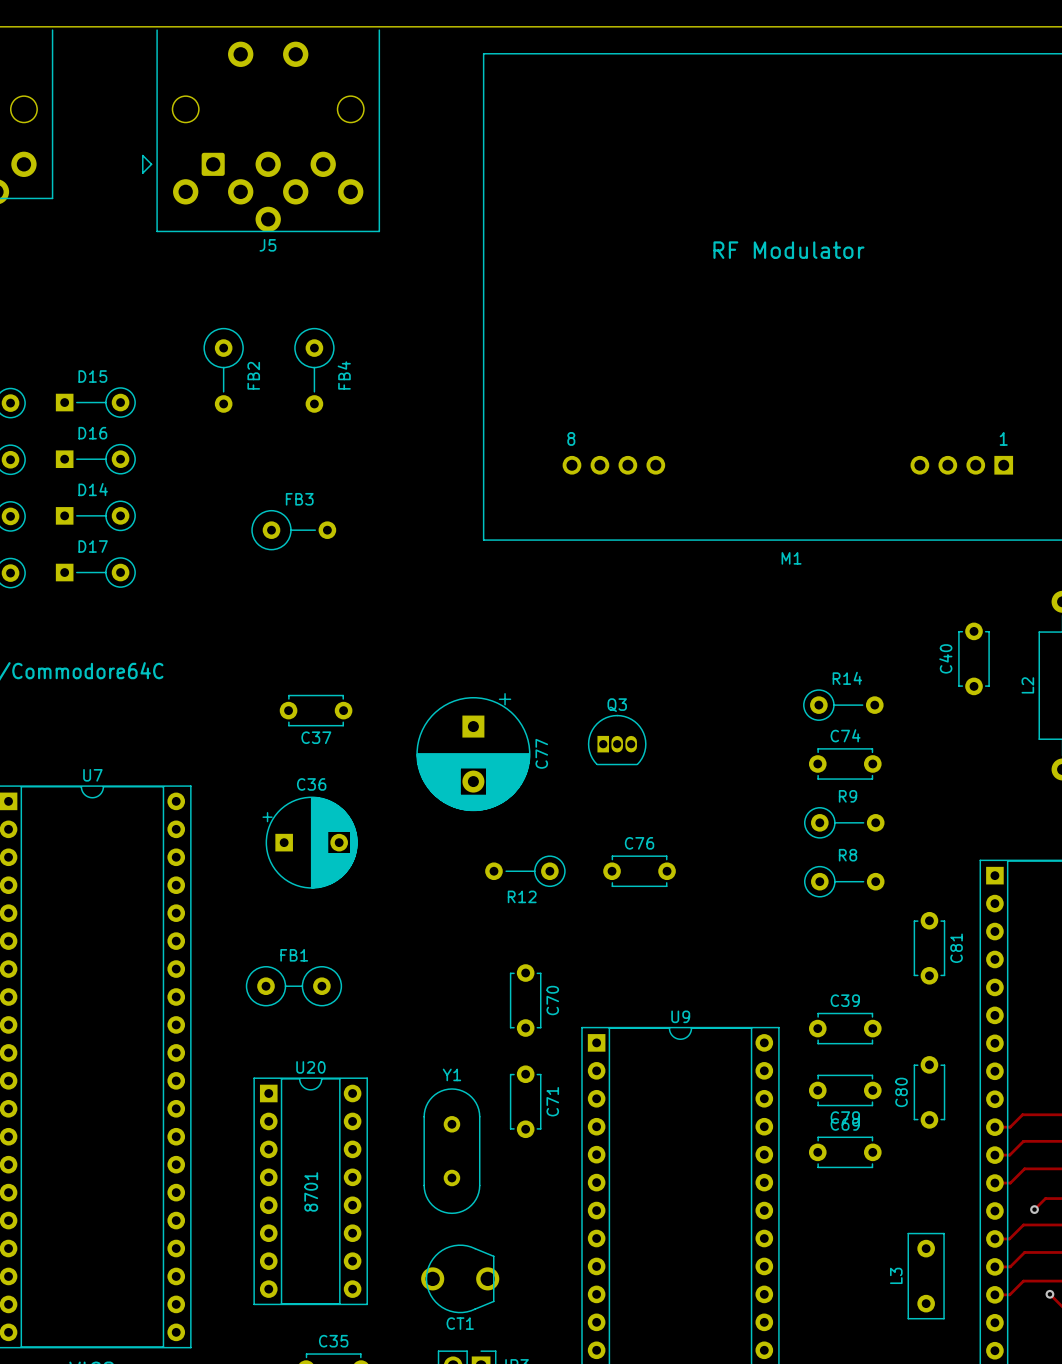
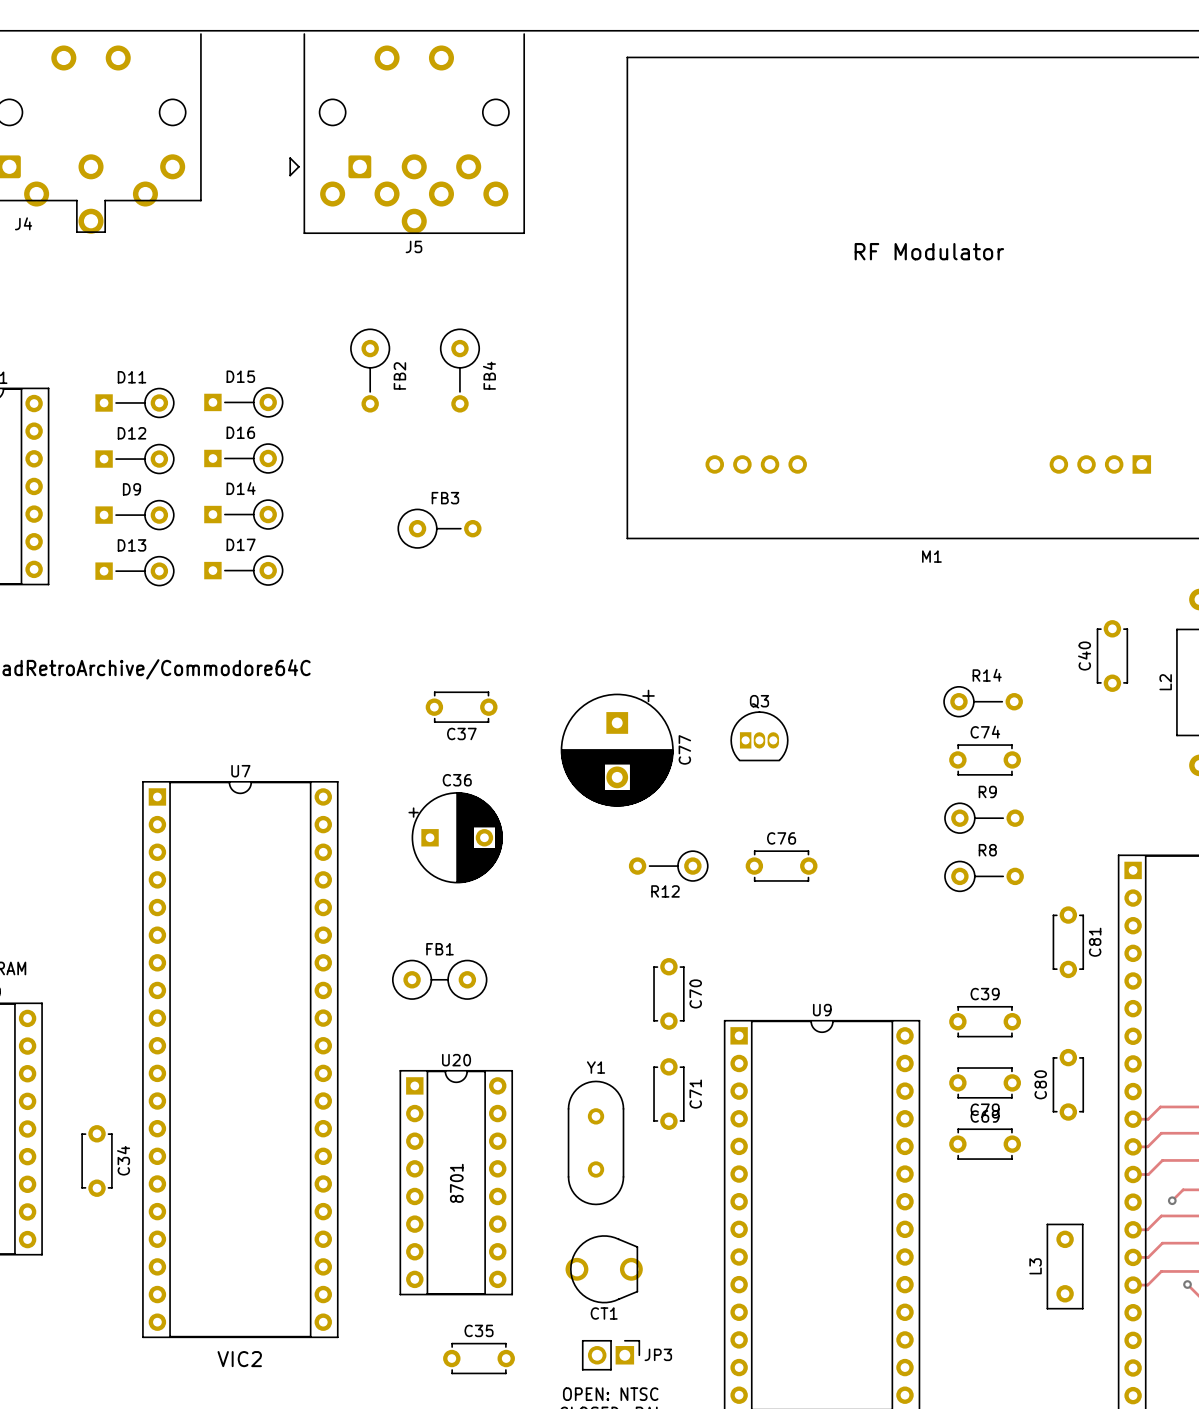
text: 8 (571, 438) -> none
text: 1 (1003, 438) -> none

